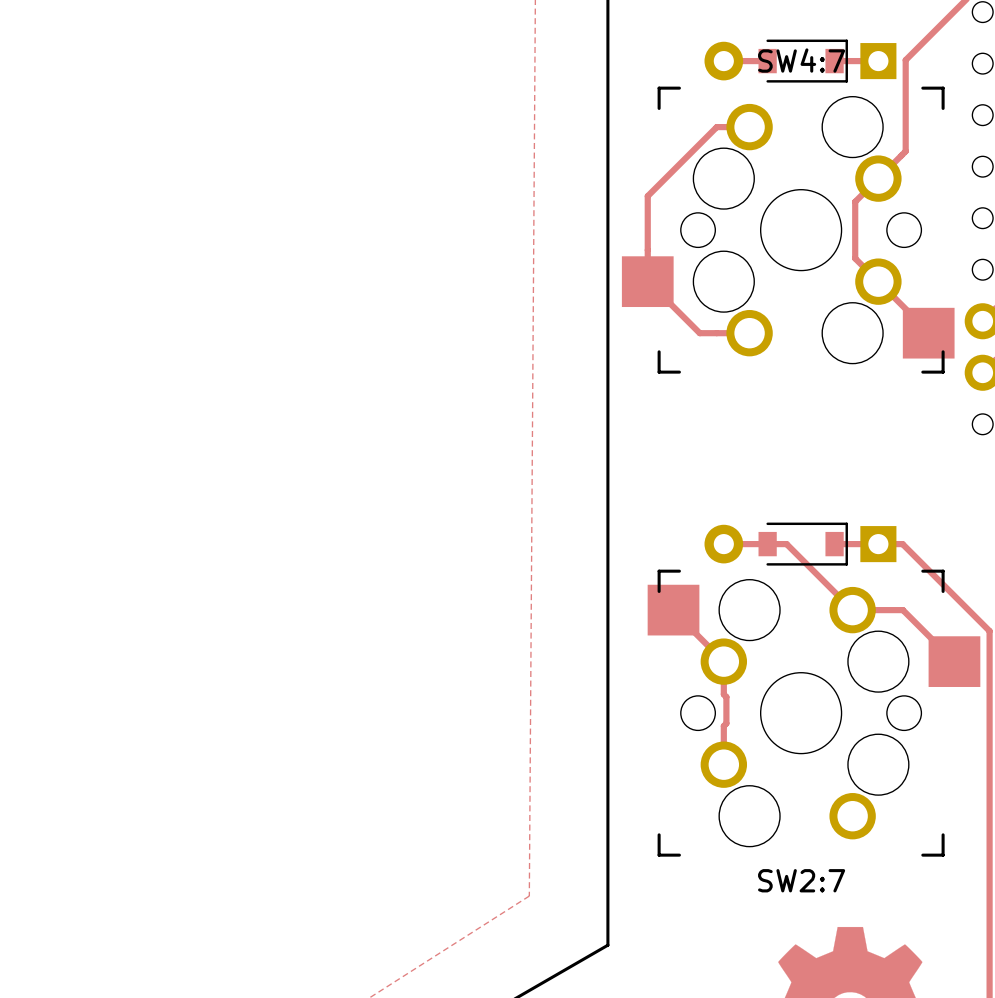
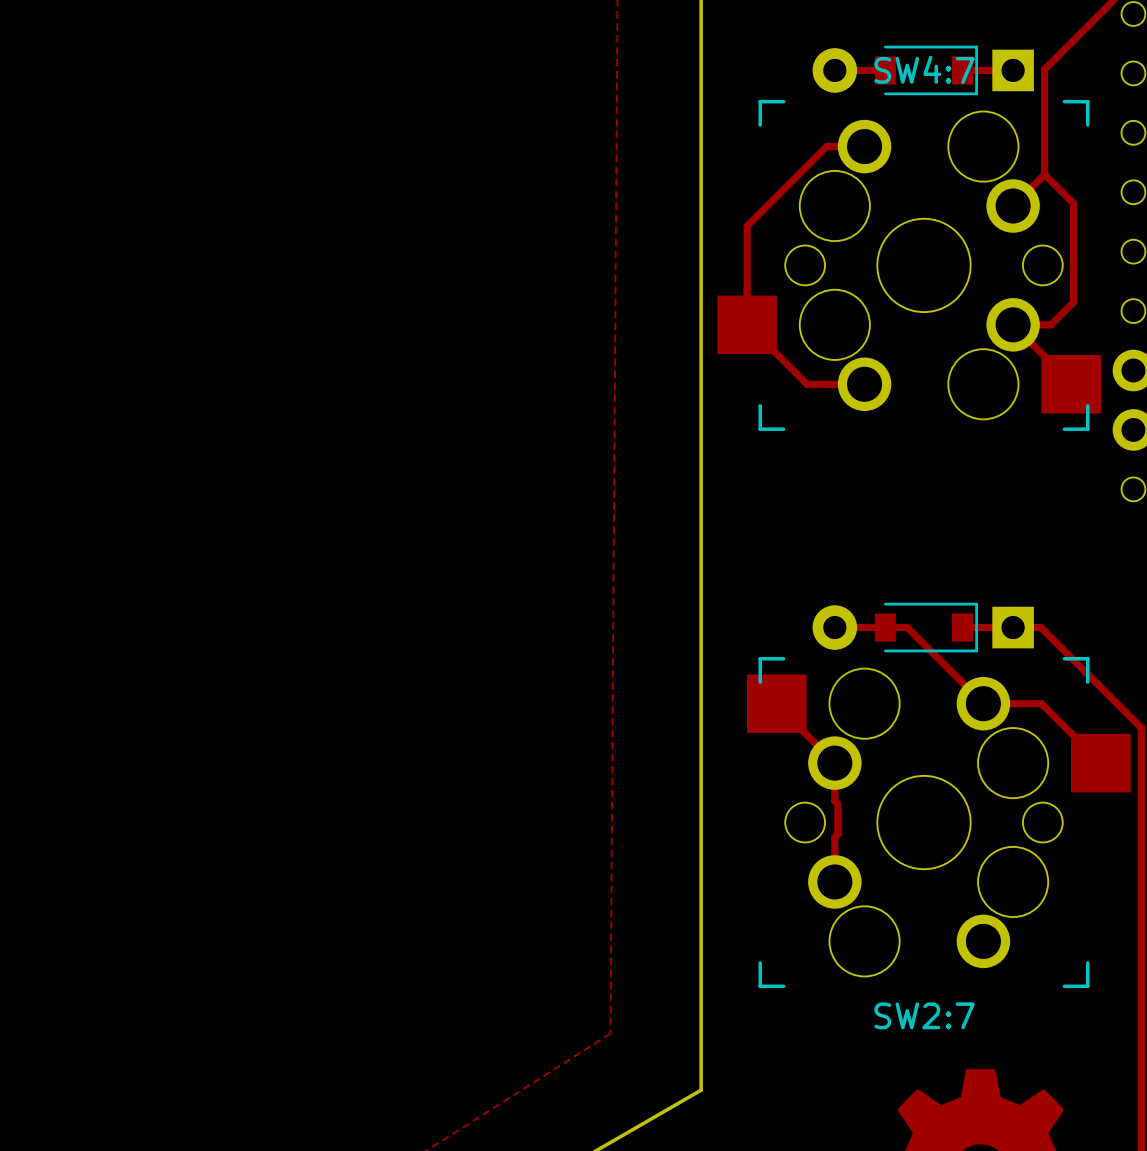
track: (878, 178) (855, 201) (855, 258) (878, 281) -> (1044, 174) (1073, 203) (1073, 302) (1050, 324) (1013, 324)

